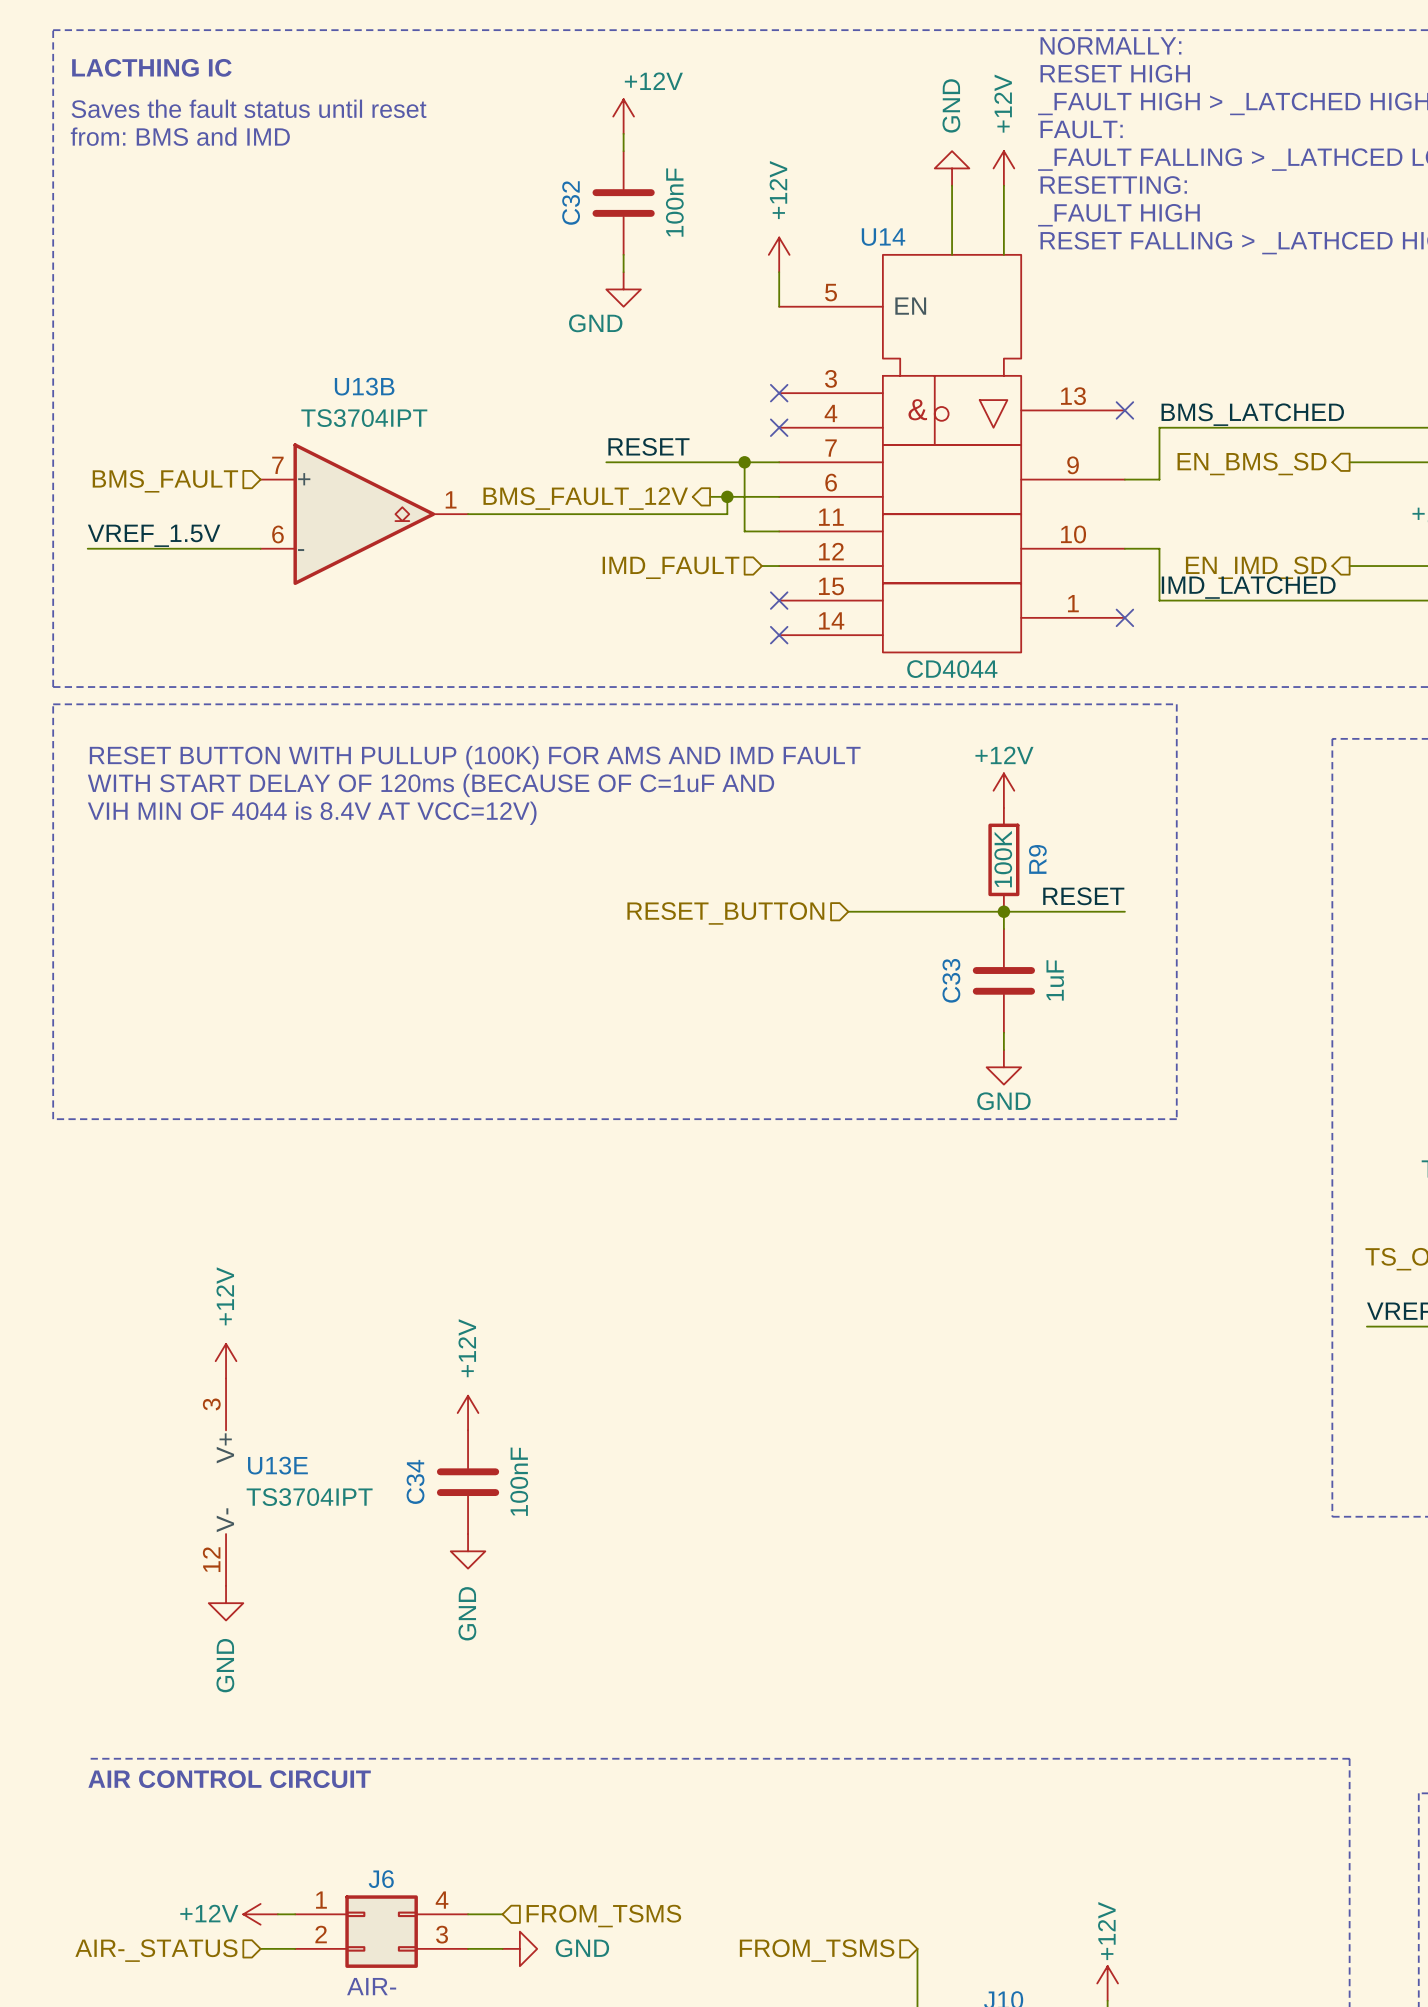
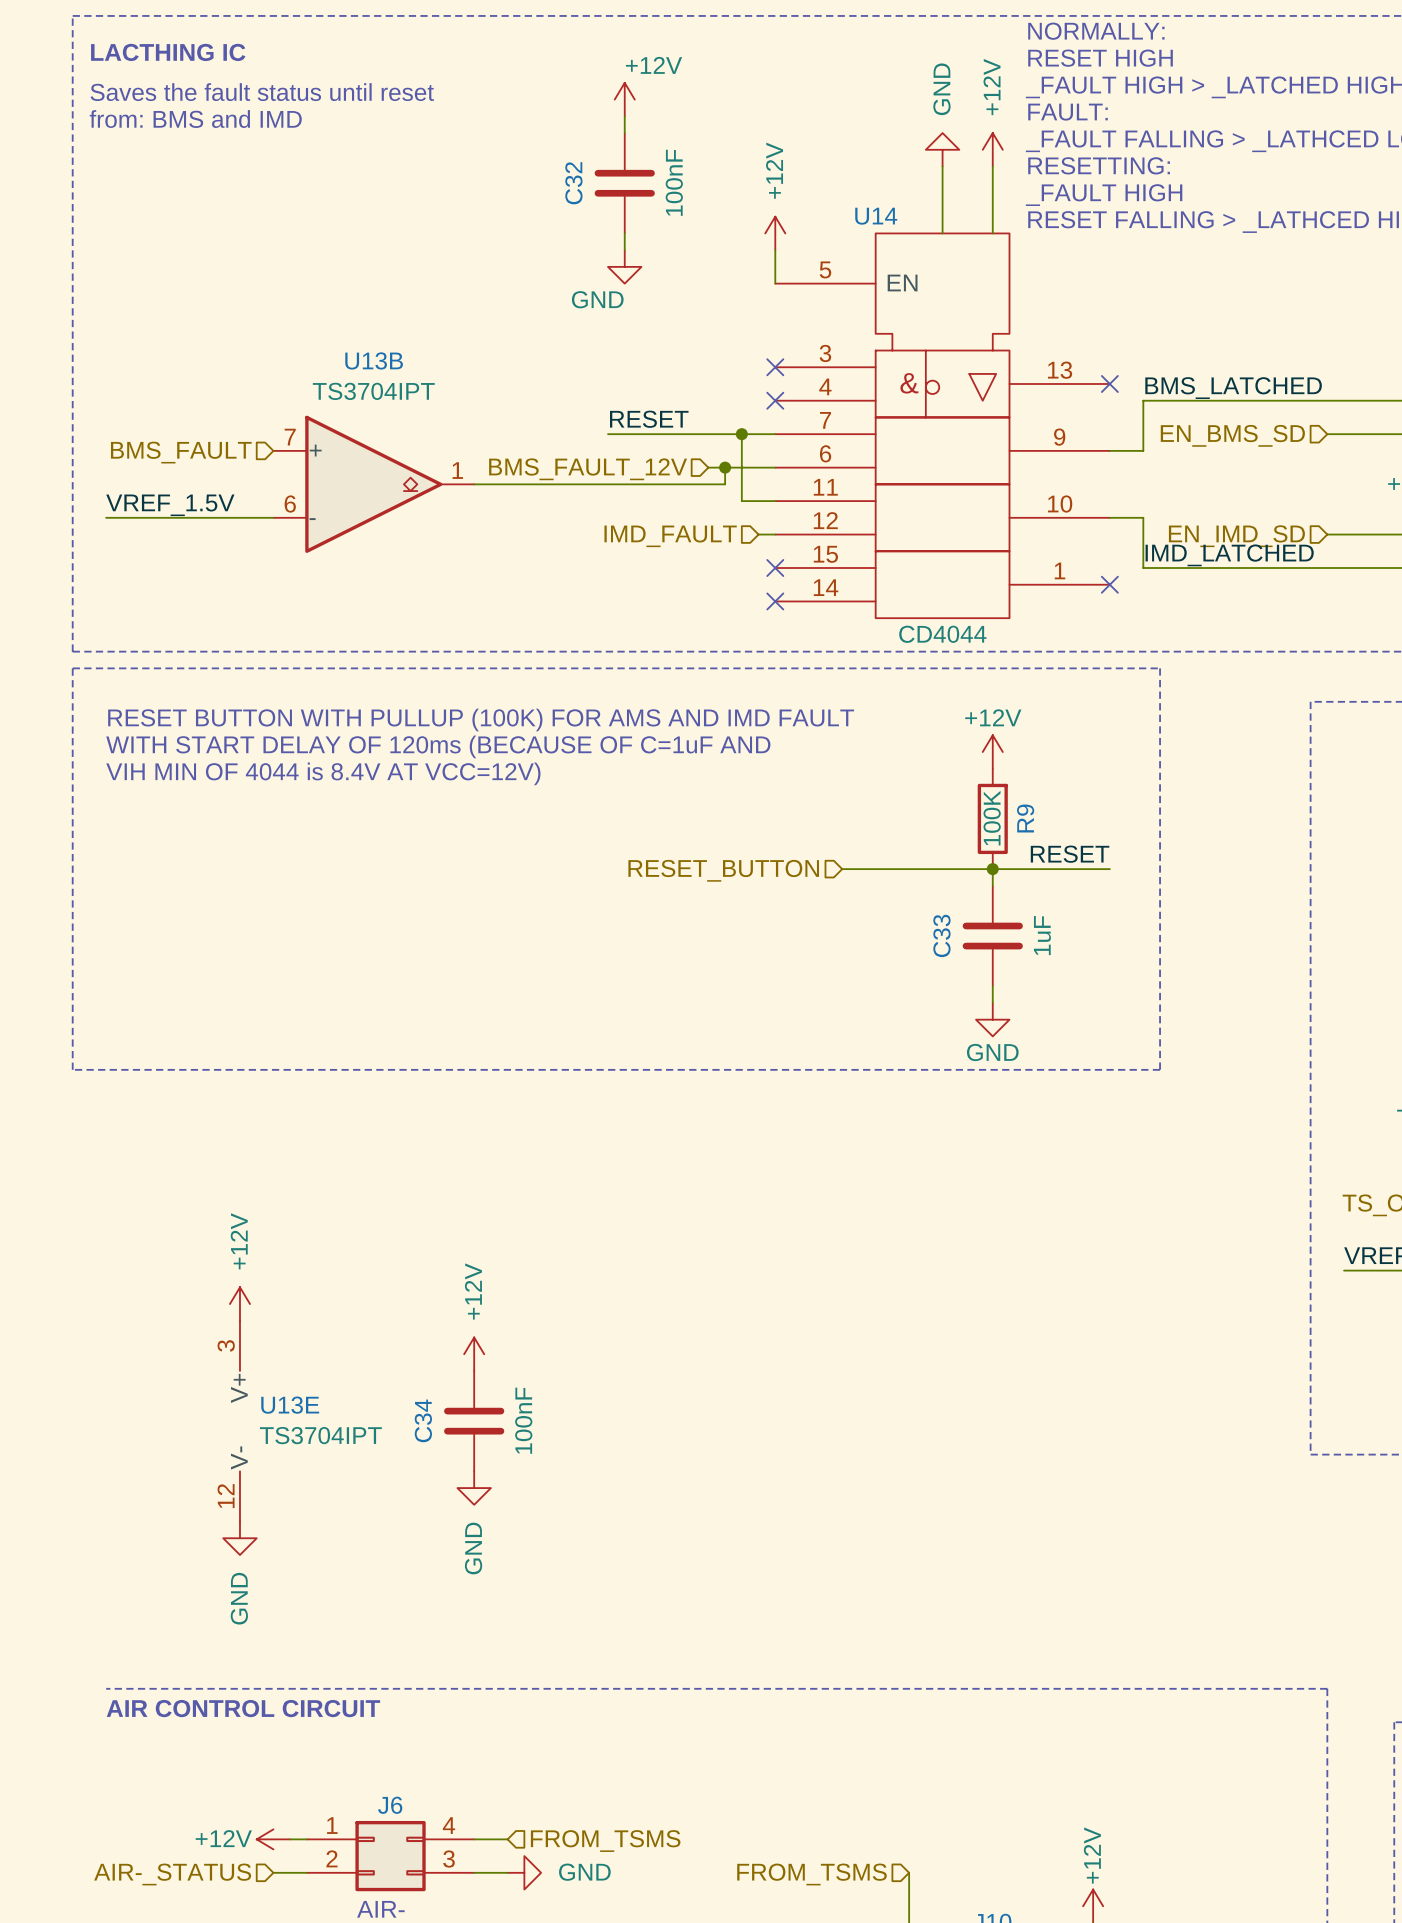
hierarchical label shape: output (1252, 464) -> input (1232, 435)
hierarchical label shape: output (585, 498) -> input (588, 469)
hierarchical label shape: output (1256, 567) -> input (1236, 536)

